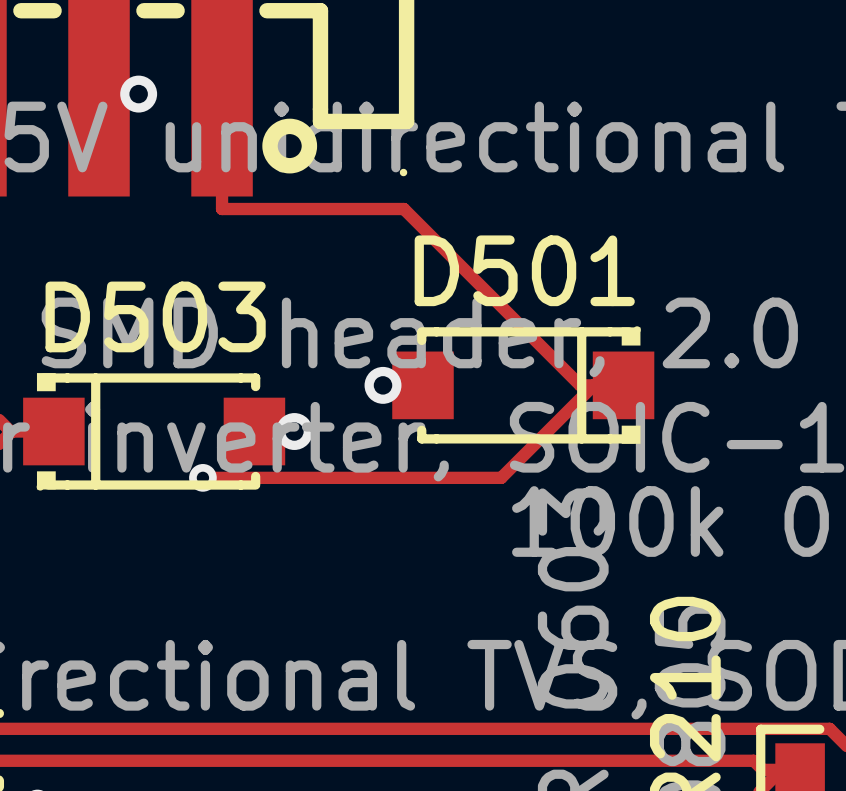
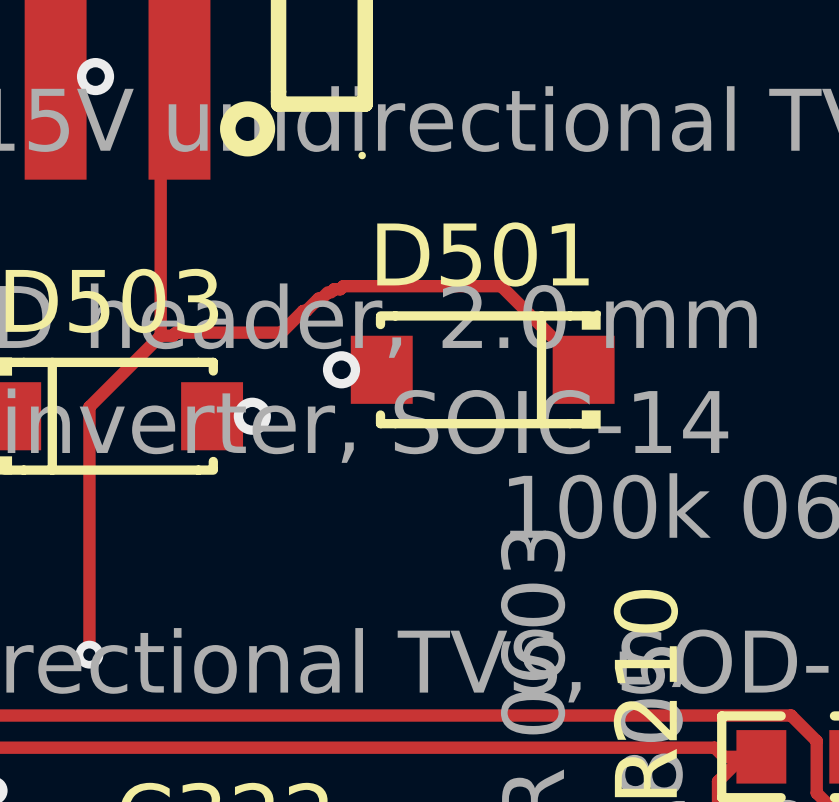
track: (222, 88) (222, 209) (403, 209) (580, 385) (623, 385) -> (330, 292) (343, 286) (501, 286) (584, 369)
track: none -> (179, 72) (160, 91) (160, 335)
track: none -> (327, 292) (306, 310) (303, 310) (281, 332) (176, 332) (173, 335) (160, 335)
track: none -> (160, 335) (89, 406) (89, 654)
track: (593, 385) (501, 477) (202, 477) -> none
via position: (202, 477) -> (89, 654)

